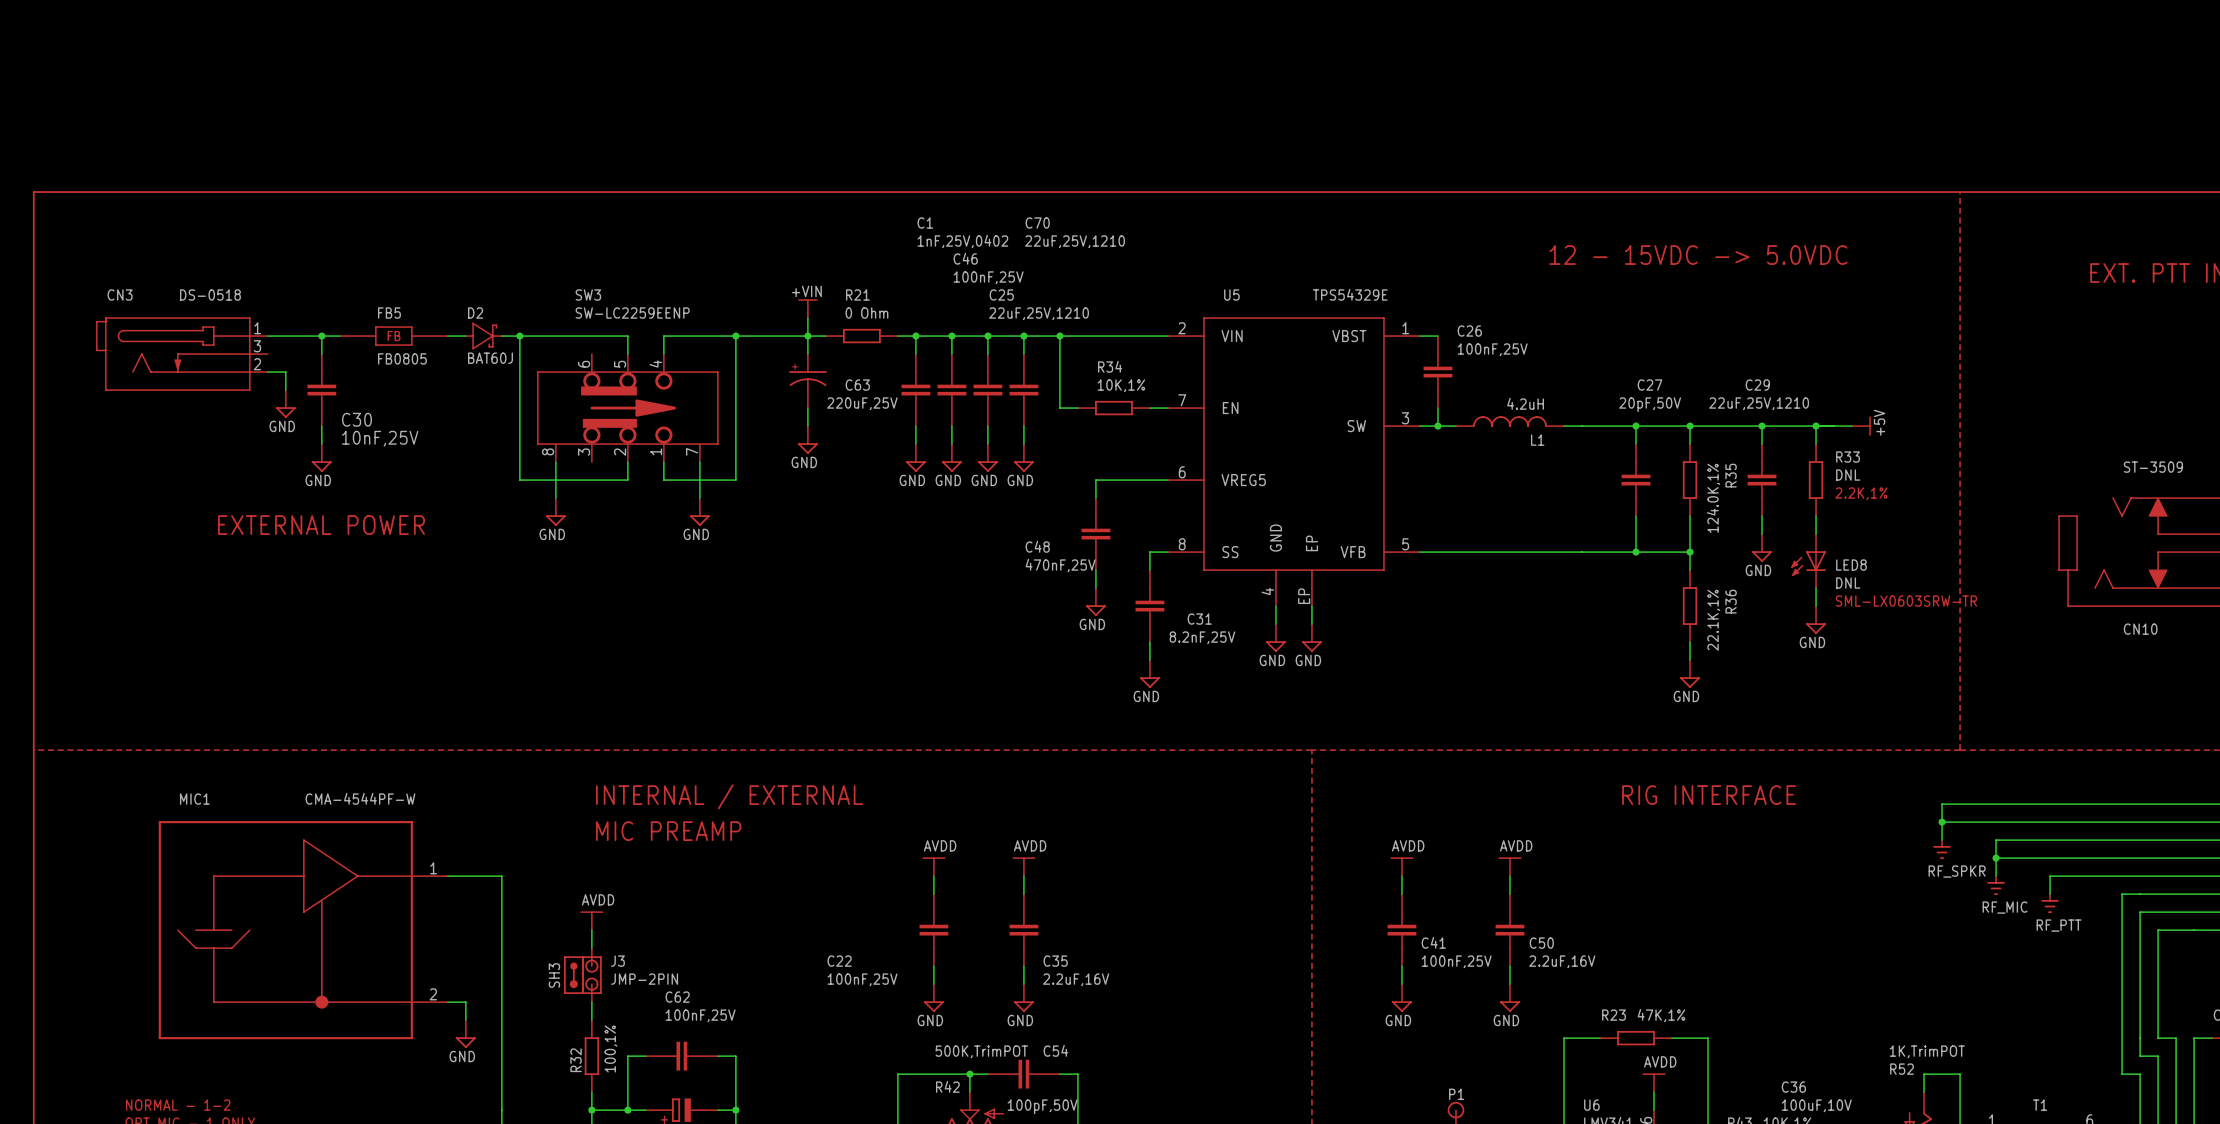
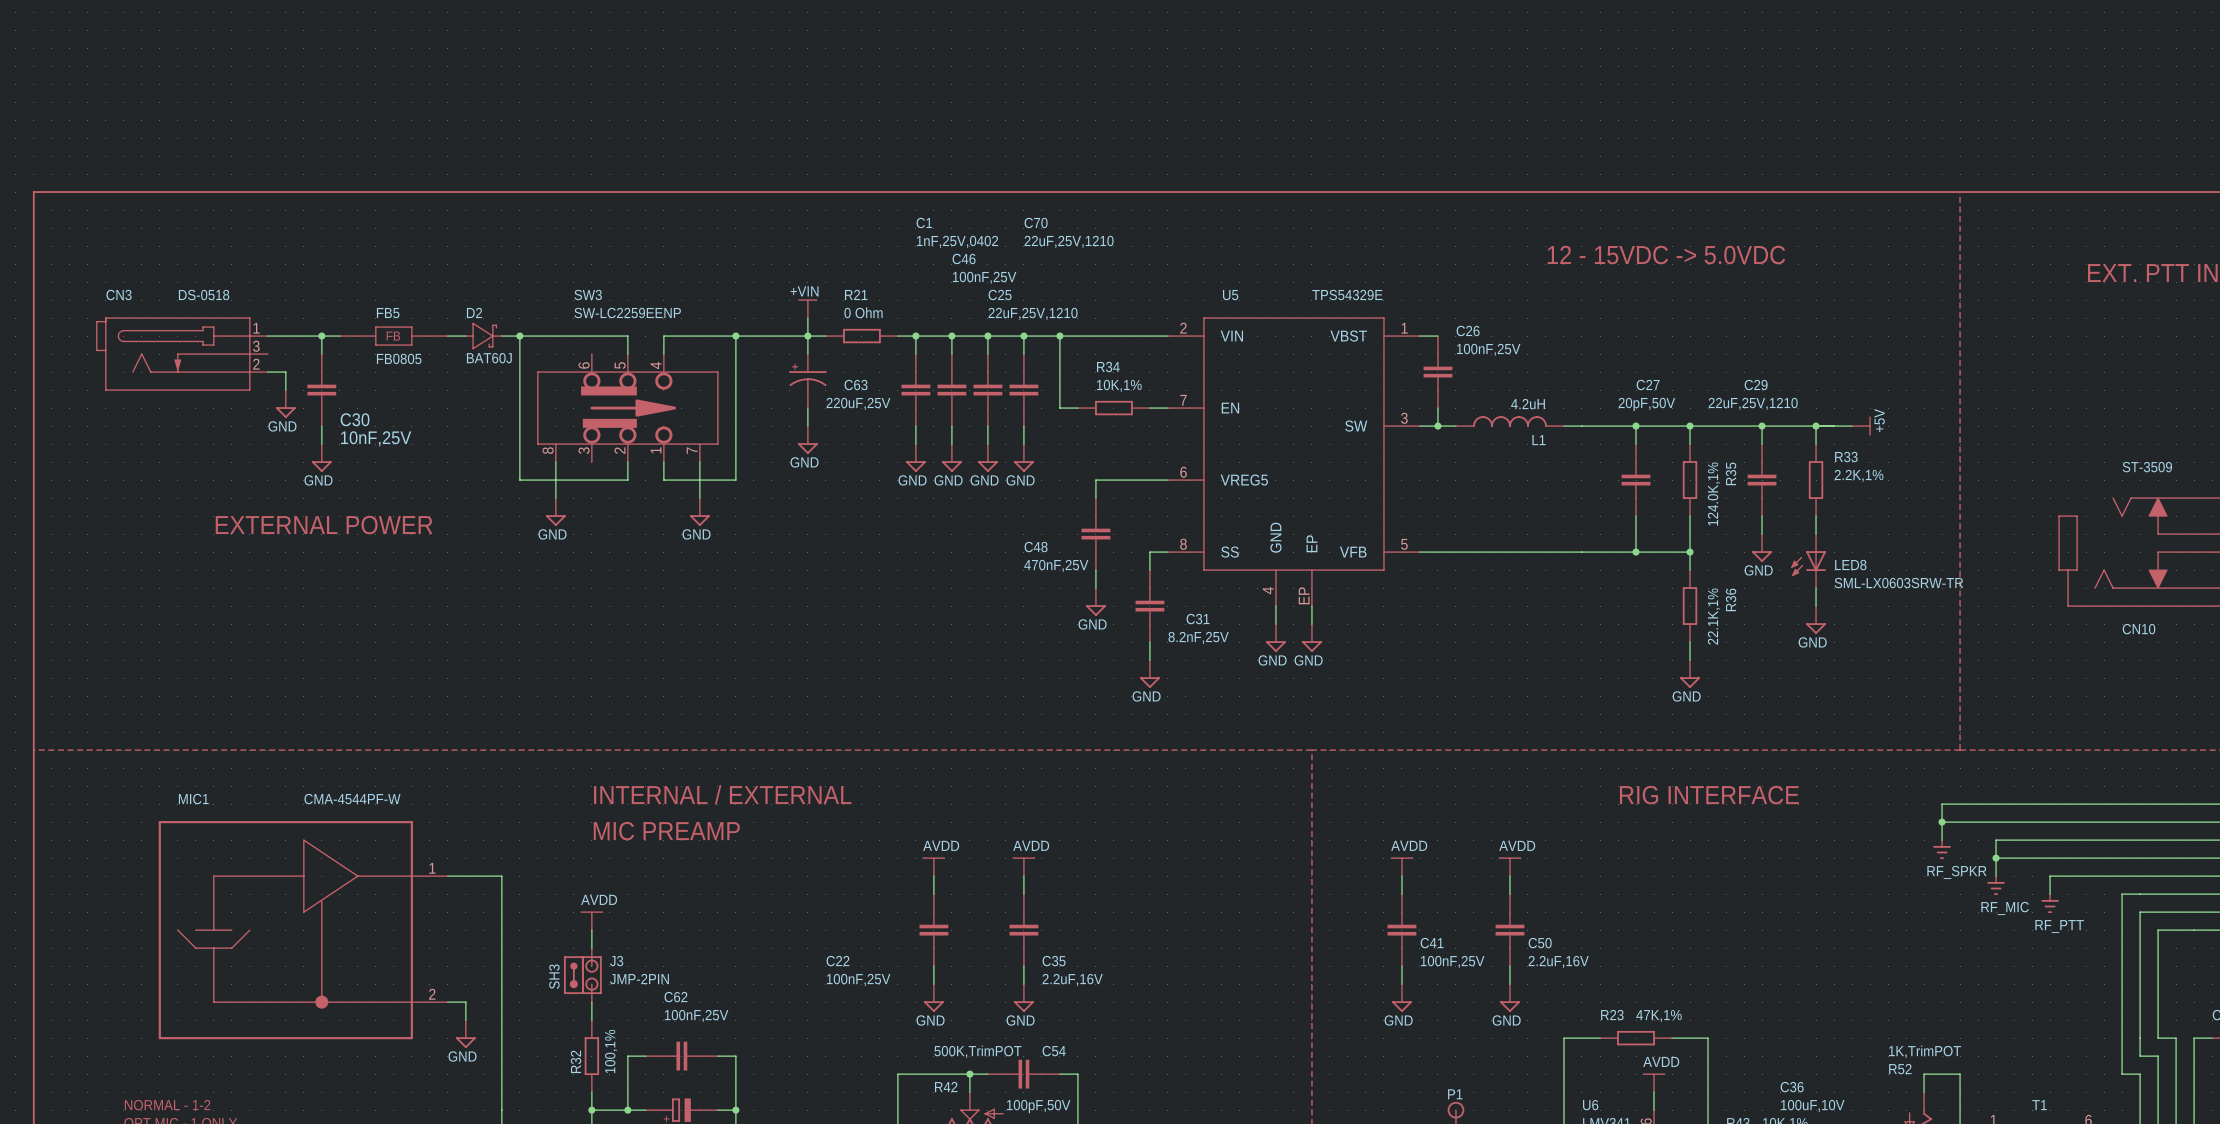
R33 value: DNL (1848, 475) -> 2.2K,1% (1859, 475)
text: 2.2K,1% (1861, 493) -> none
LED8 value: DNL (1848, 583) -> SML-LX0603SRW-TR (1898, 583)
text: SML-LX0603SRW-TR (1906, 601) -> none

